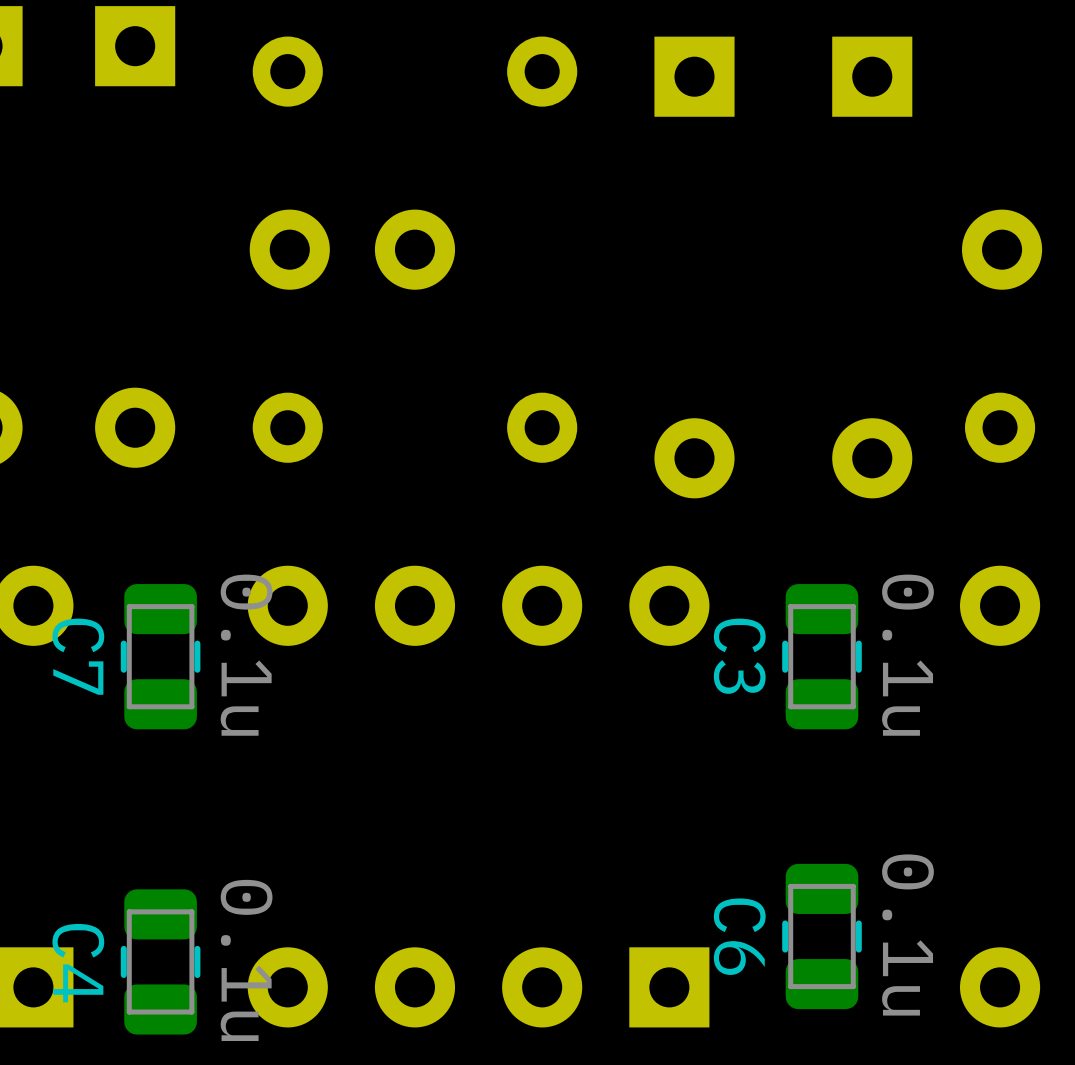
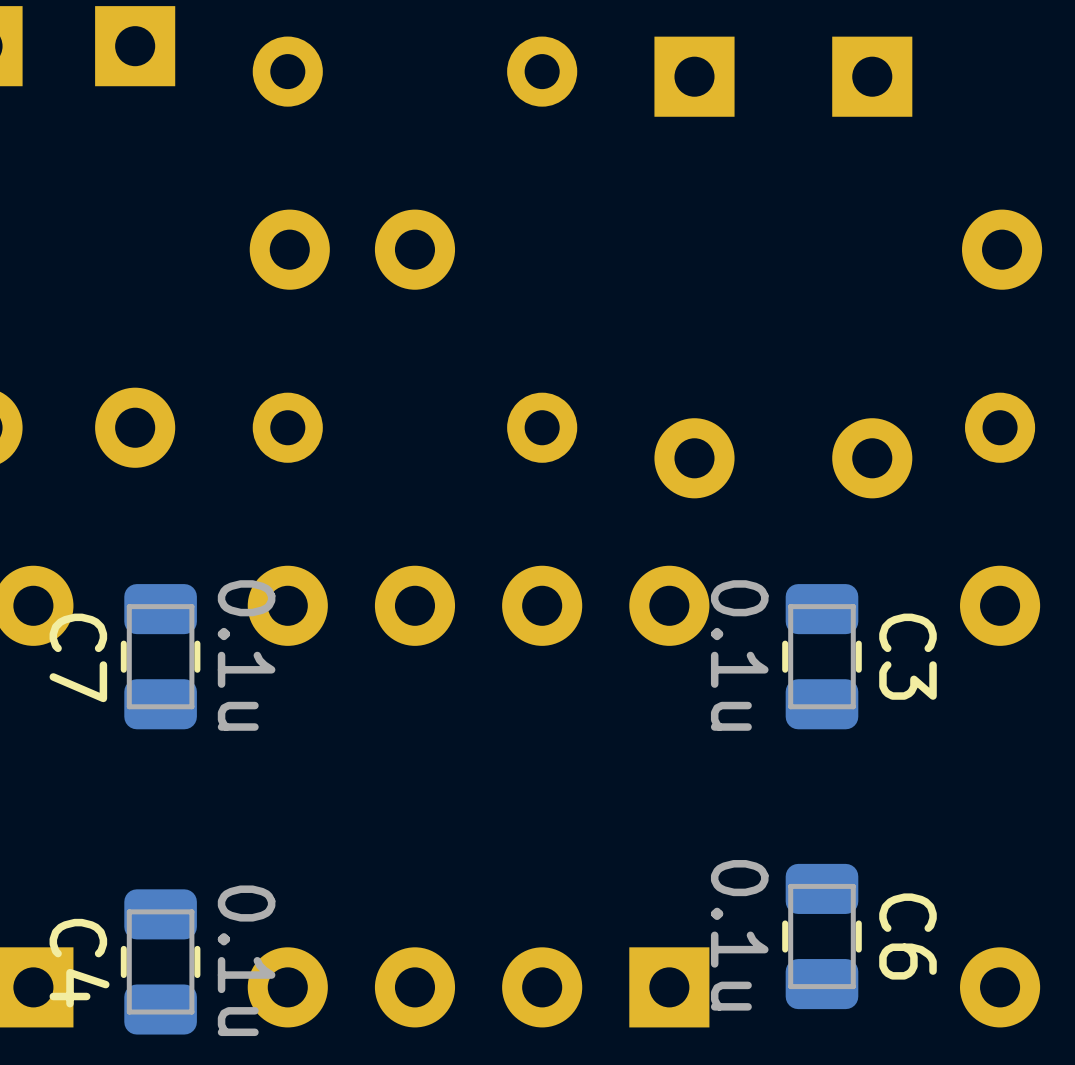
C3 value position: 0.1u (907, 655) -> 0.1u (739, 655)
C3 name position: C3 (739, 656) -> C3 (907, 656)
C6 value position: 0.1u (907, 934) -> 0.1u (739, 935)
C6 name position: C6 (739, 936) -> C6 (907, 936)

